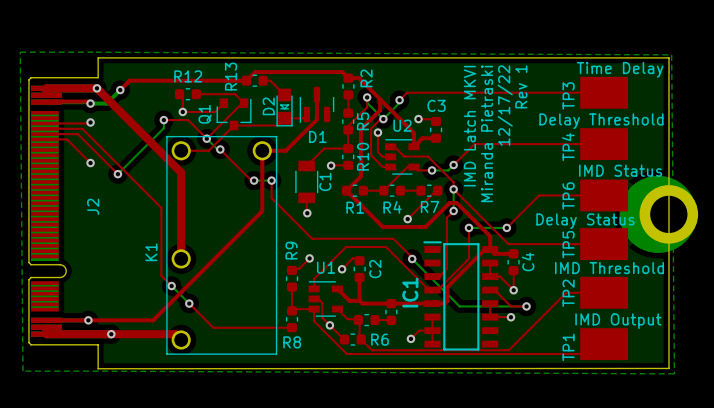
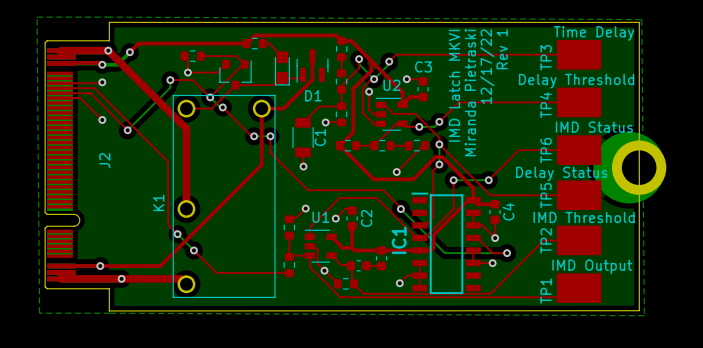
R13: (254, 80) -> none
part: none -> (254, 43)
R2: (348, 86) -> none
part: none -> (341, 48)
R12: (187, 94) -> none
part: none -> (192, 56)
D2: (284, 107) -> none
part: none -> (282, 68)
Q1: (234, 114) -> none
R5: (348, 121) -> none
part: none -> (341, 81)
R10: (348, 156) -> none
part: none -> (341, 114)
R1: (354, 190) -> none
part: none -> (347, 145)
R4: (392, 190) -> none
part: none -> (382, 145)
R7: (429, 190) -> none
part: none -> (416, 145)
R9: (292, 278) -> none
part: none -> (289, 227)
R8: (292, 319) -> none
part: none -> (289, 265)
R6: (352, 339) -> none
part: none -> (345, 283)

